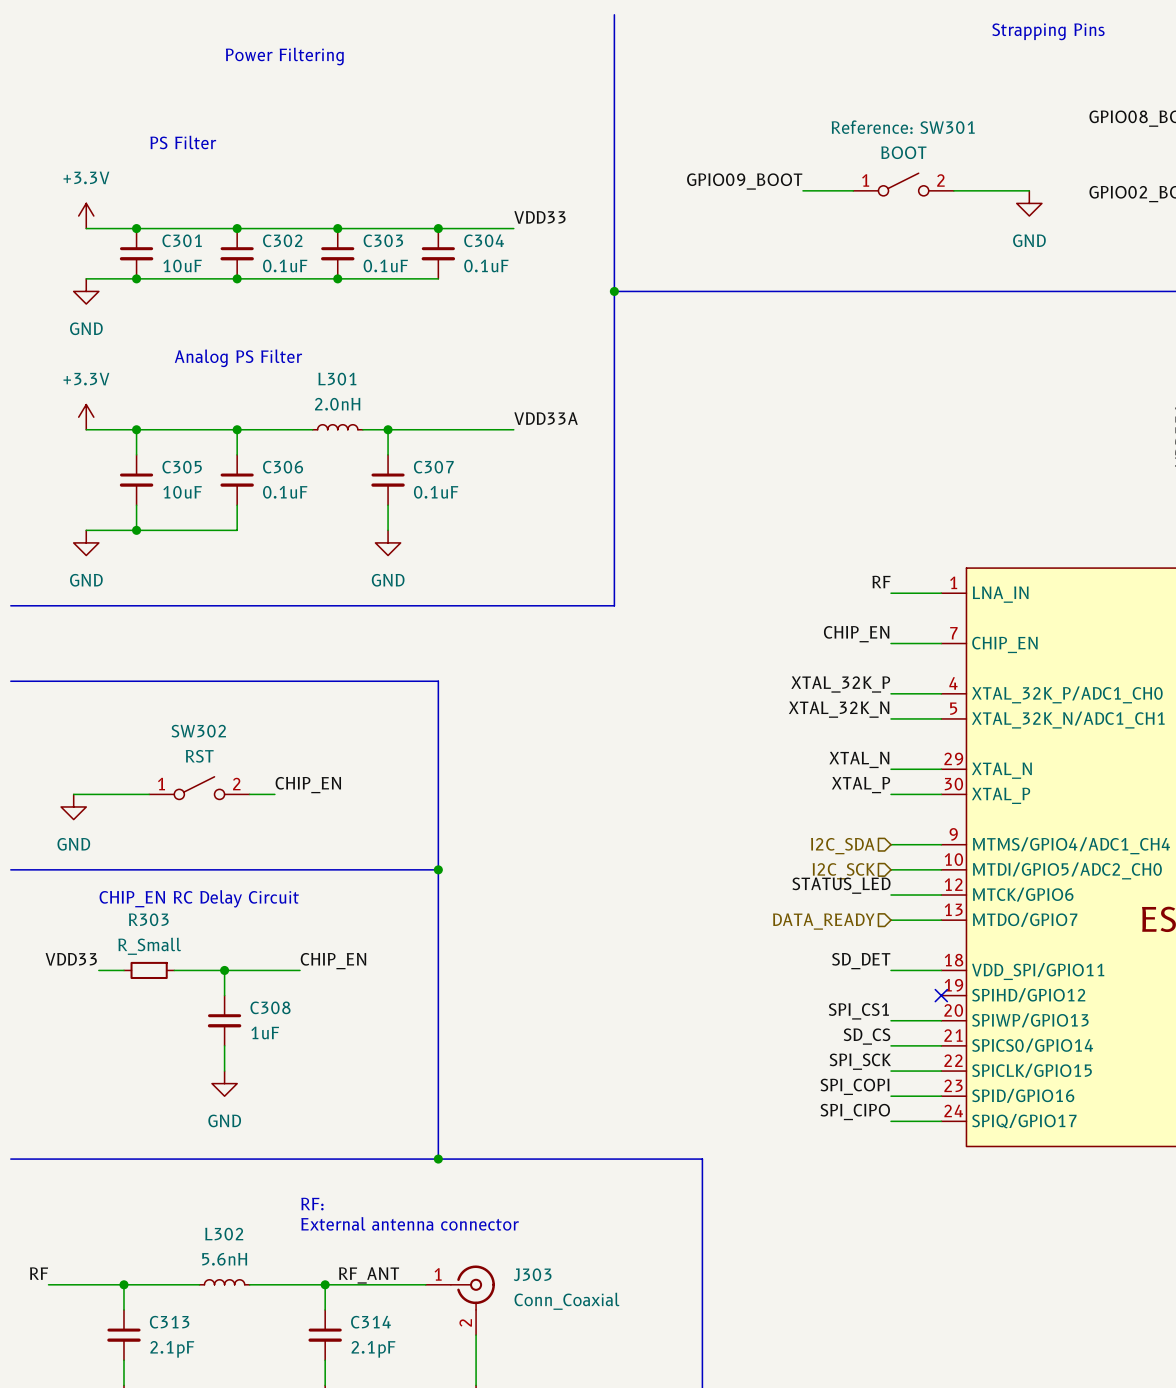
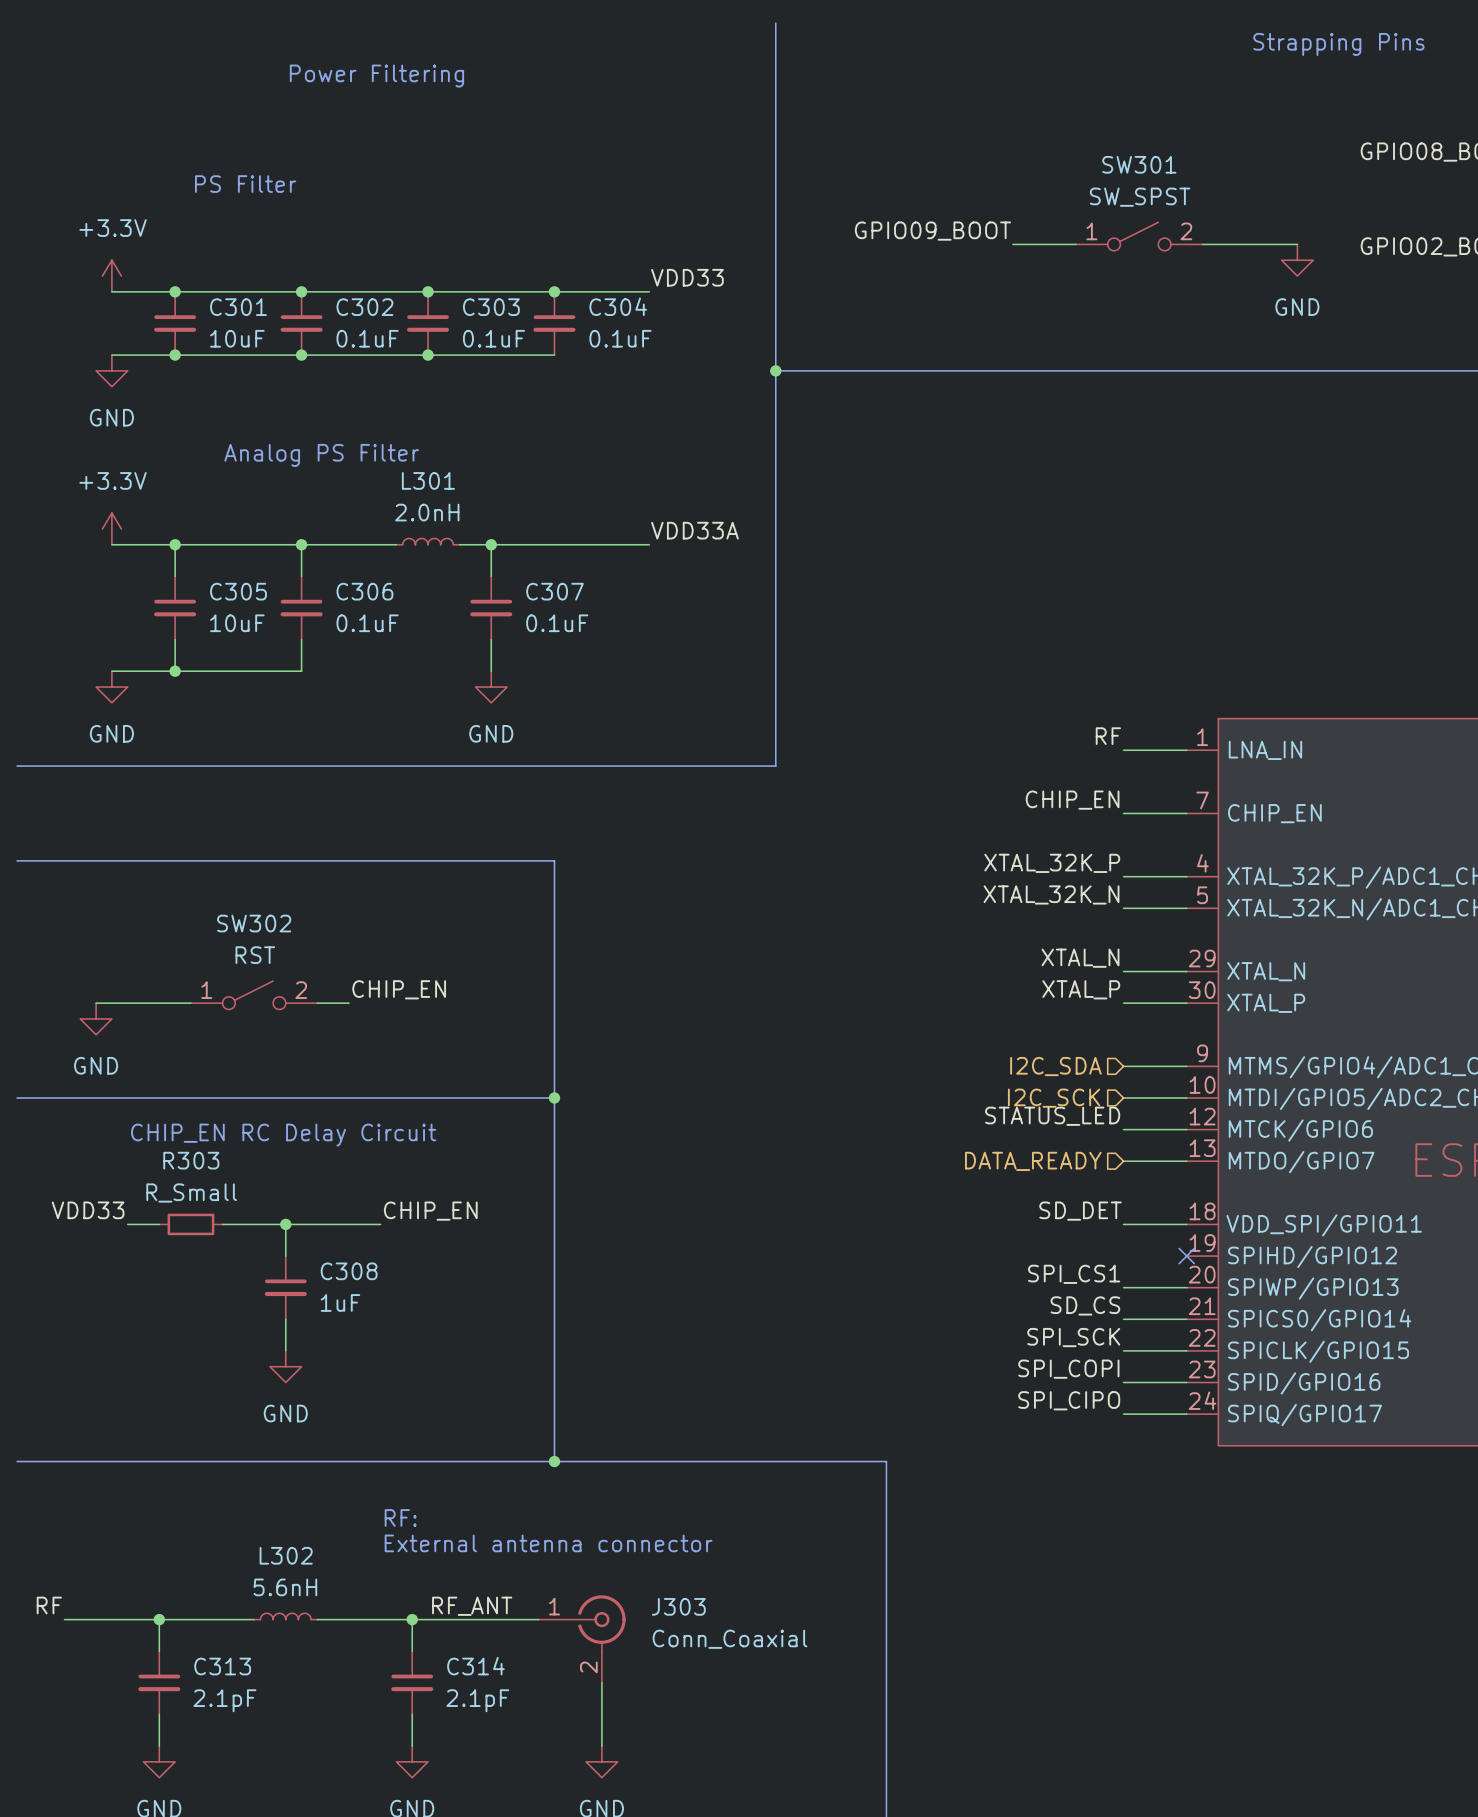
SW301 name: Reference: SW301 (903, 127) -> SW301 (1139, 164)
SW301 value: BOOT (903, 152) -> SW_SPST (1140, 197)

